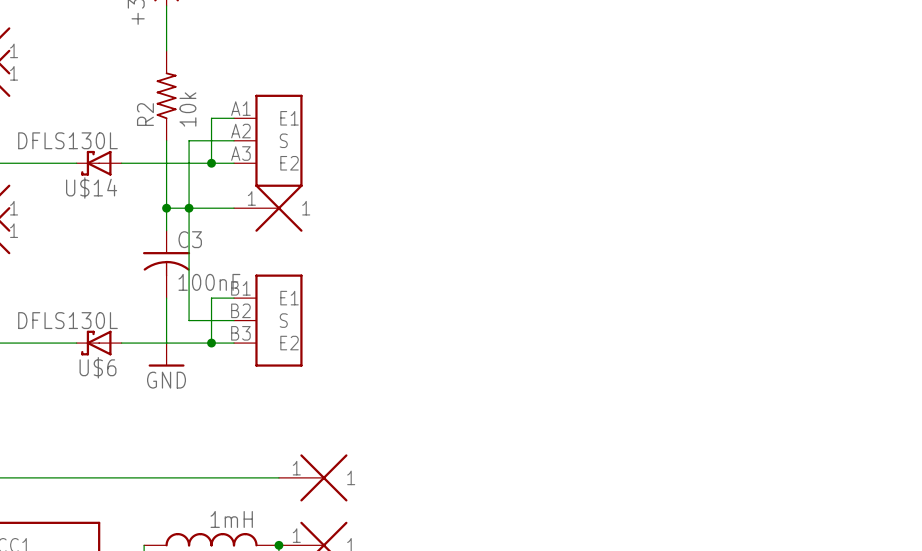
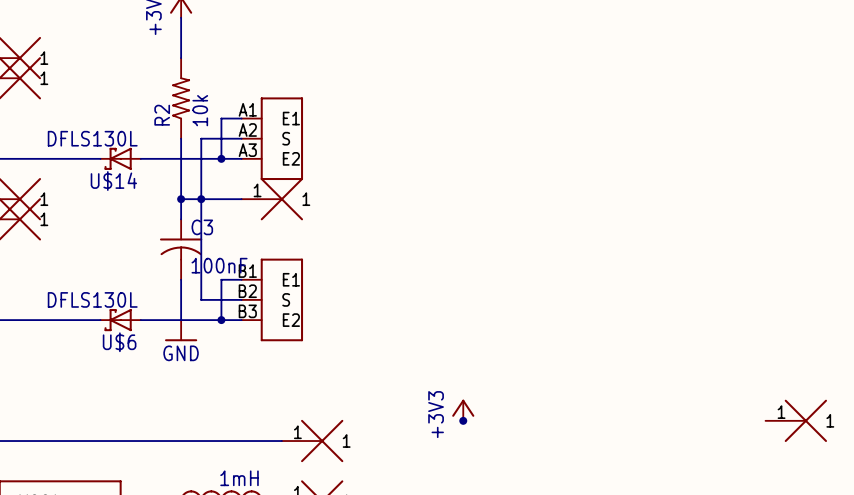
power symbol: none -> +3V3 (463, 410)
junction: none -> (463, 420)
part: none -> (796, 420)

